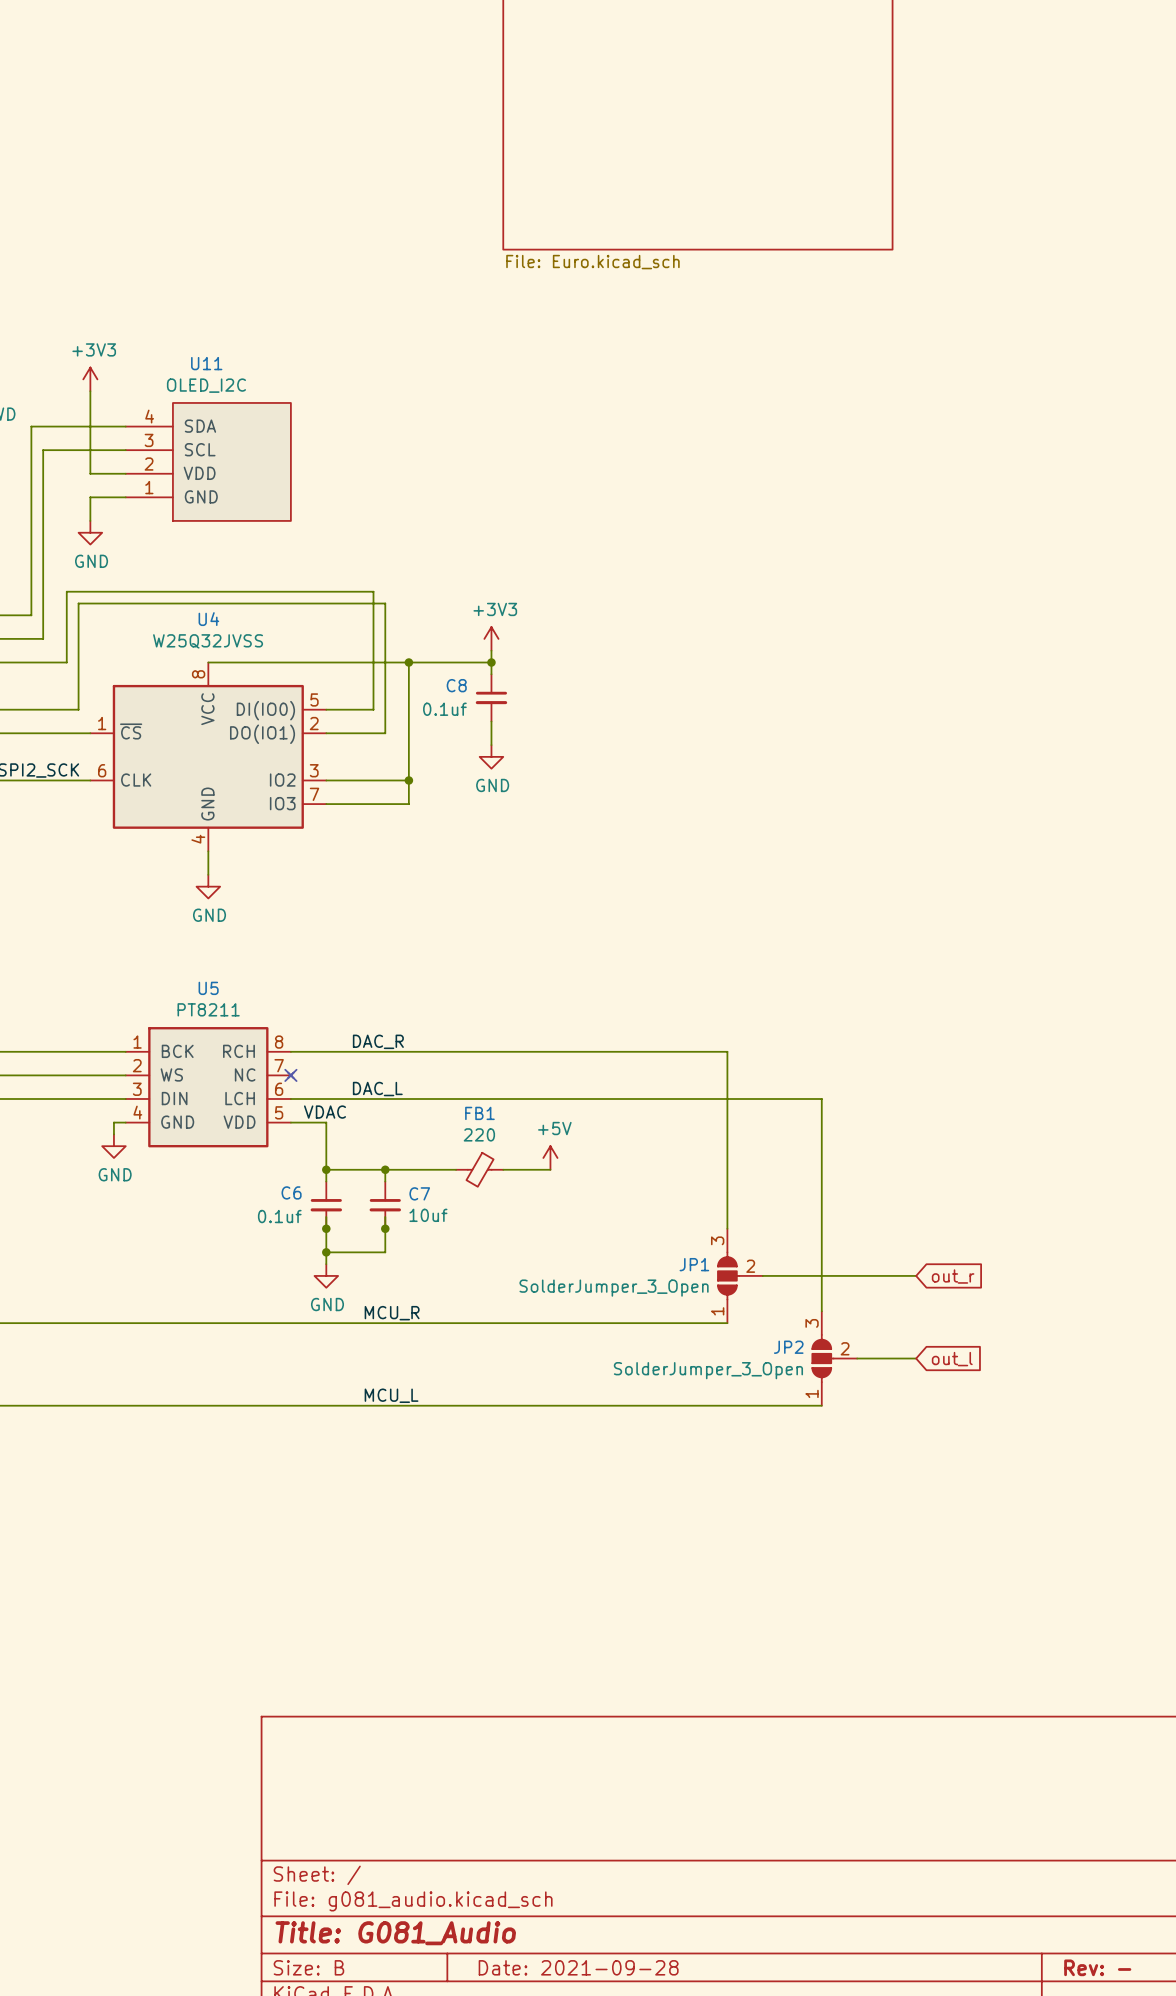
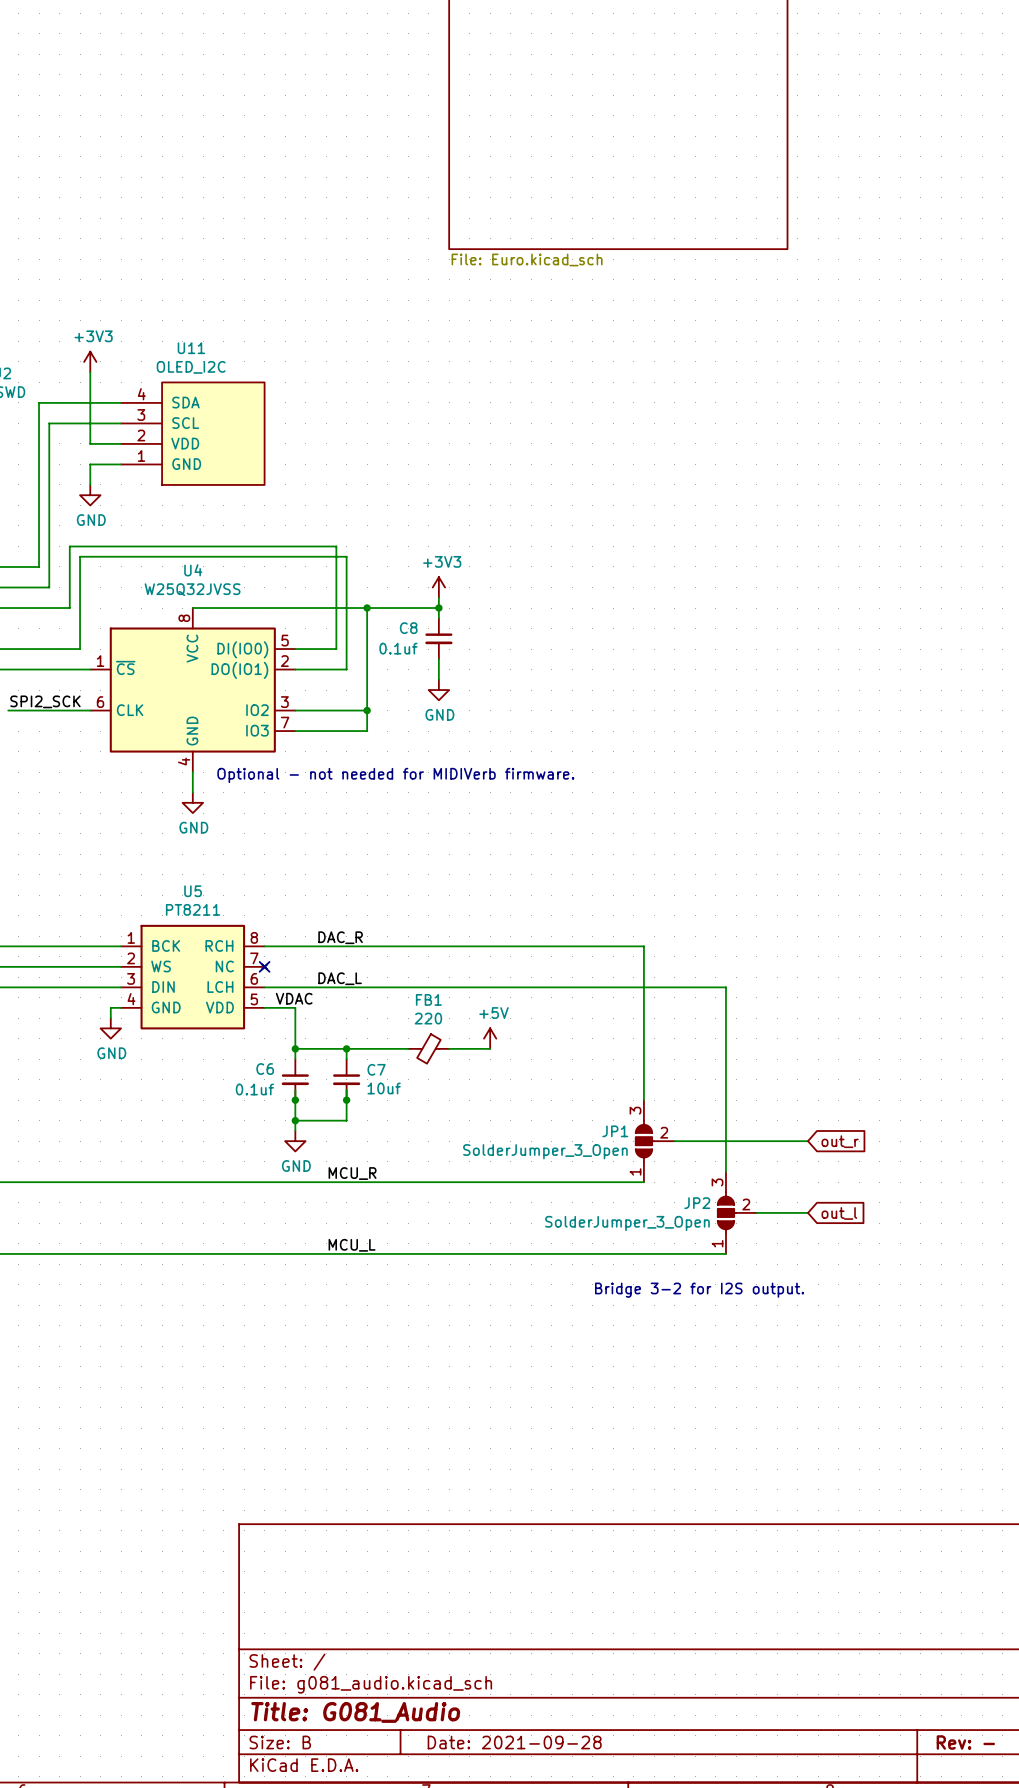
text: none -> Optional - not needed for MIDIVerb firmware. (395, 775)
text: none -> Bridge 3-2 for I2S output. (699, 1290)

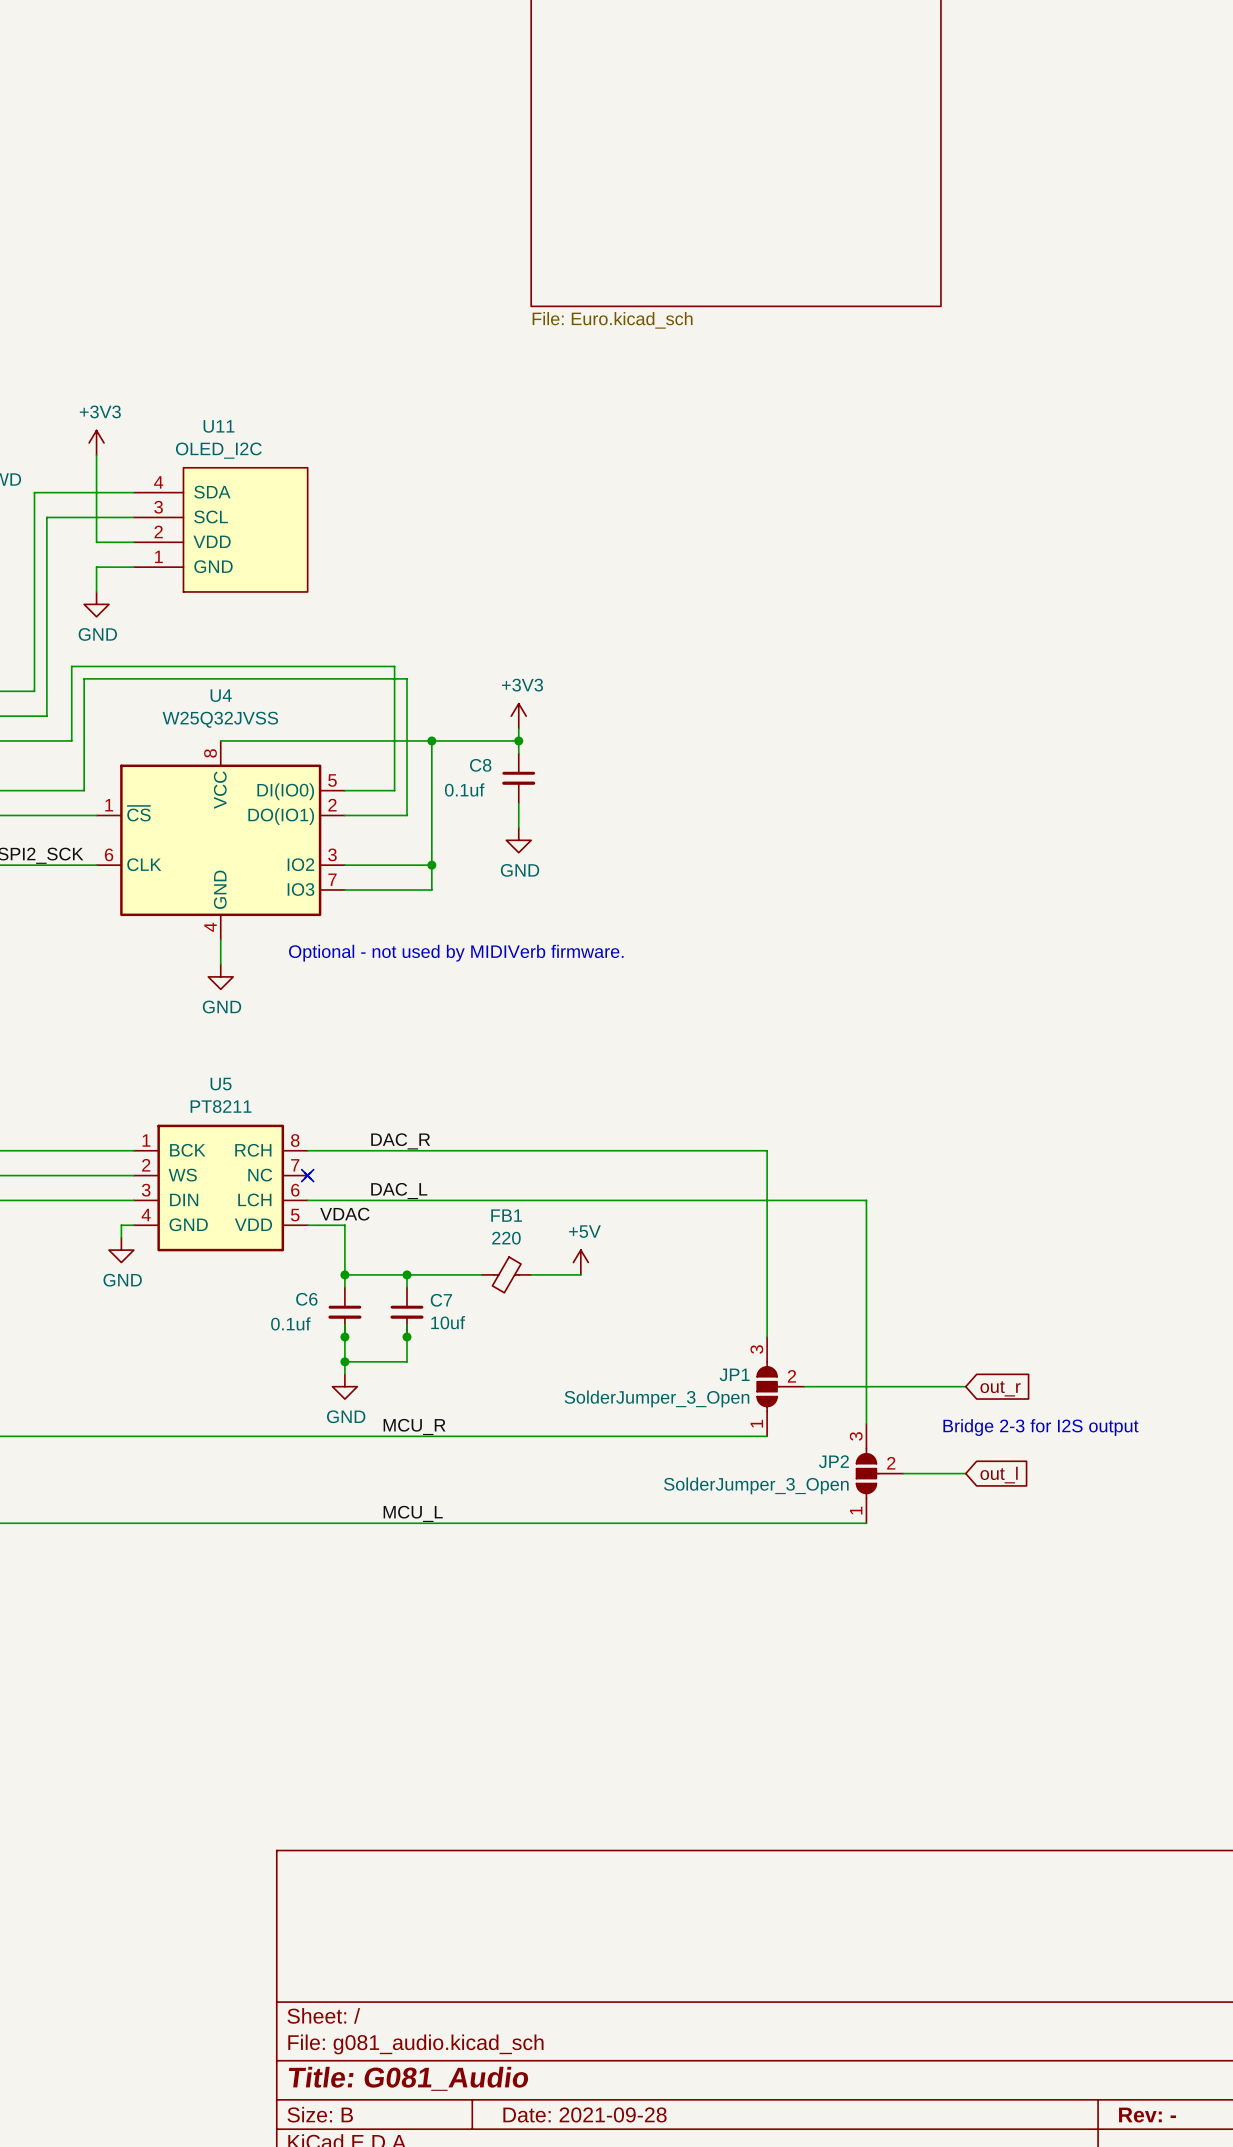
text: Optional - not needed for MIDIVerb firmware. (395, 775) -> Optional - not used by MIDIVerb firmware. (456, 953)
text: none -> Bridge 2-3 for I2S output (1040, 1427)
text: Bridge 3-2 for I2S output. (699, 1290) -> none

